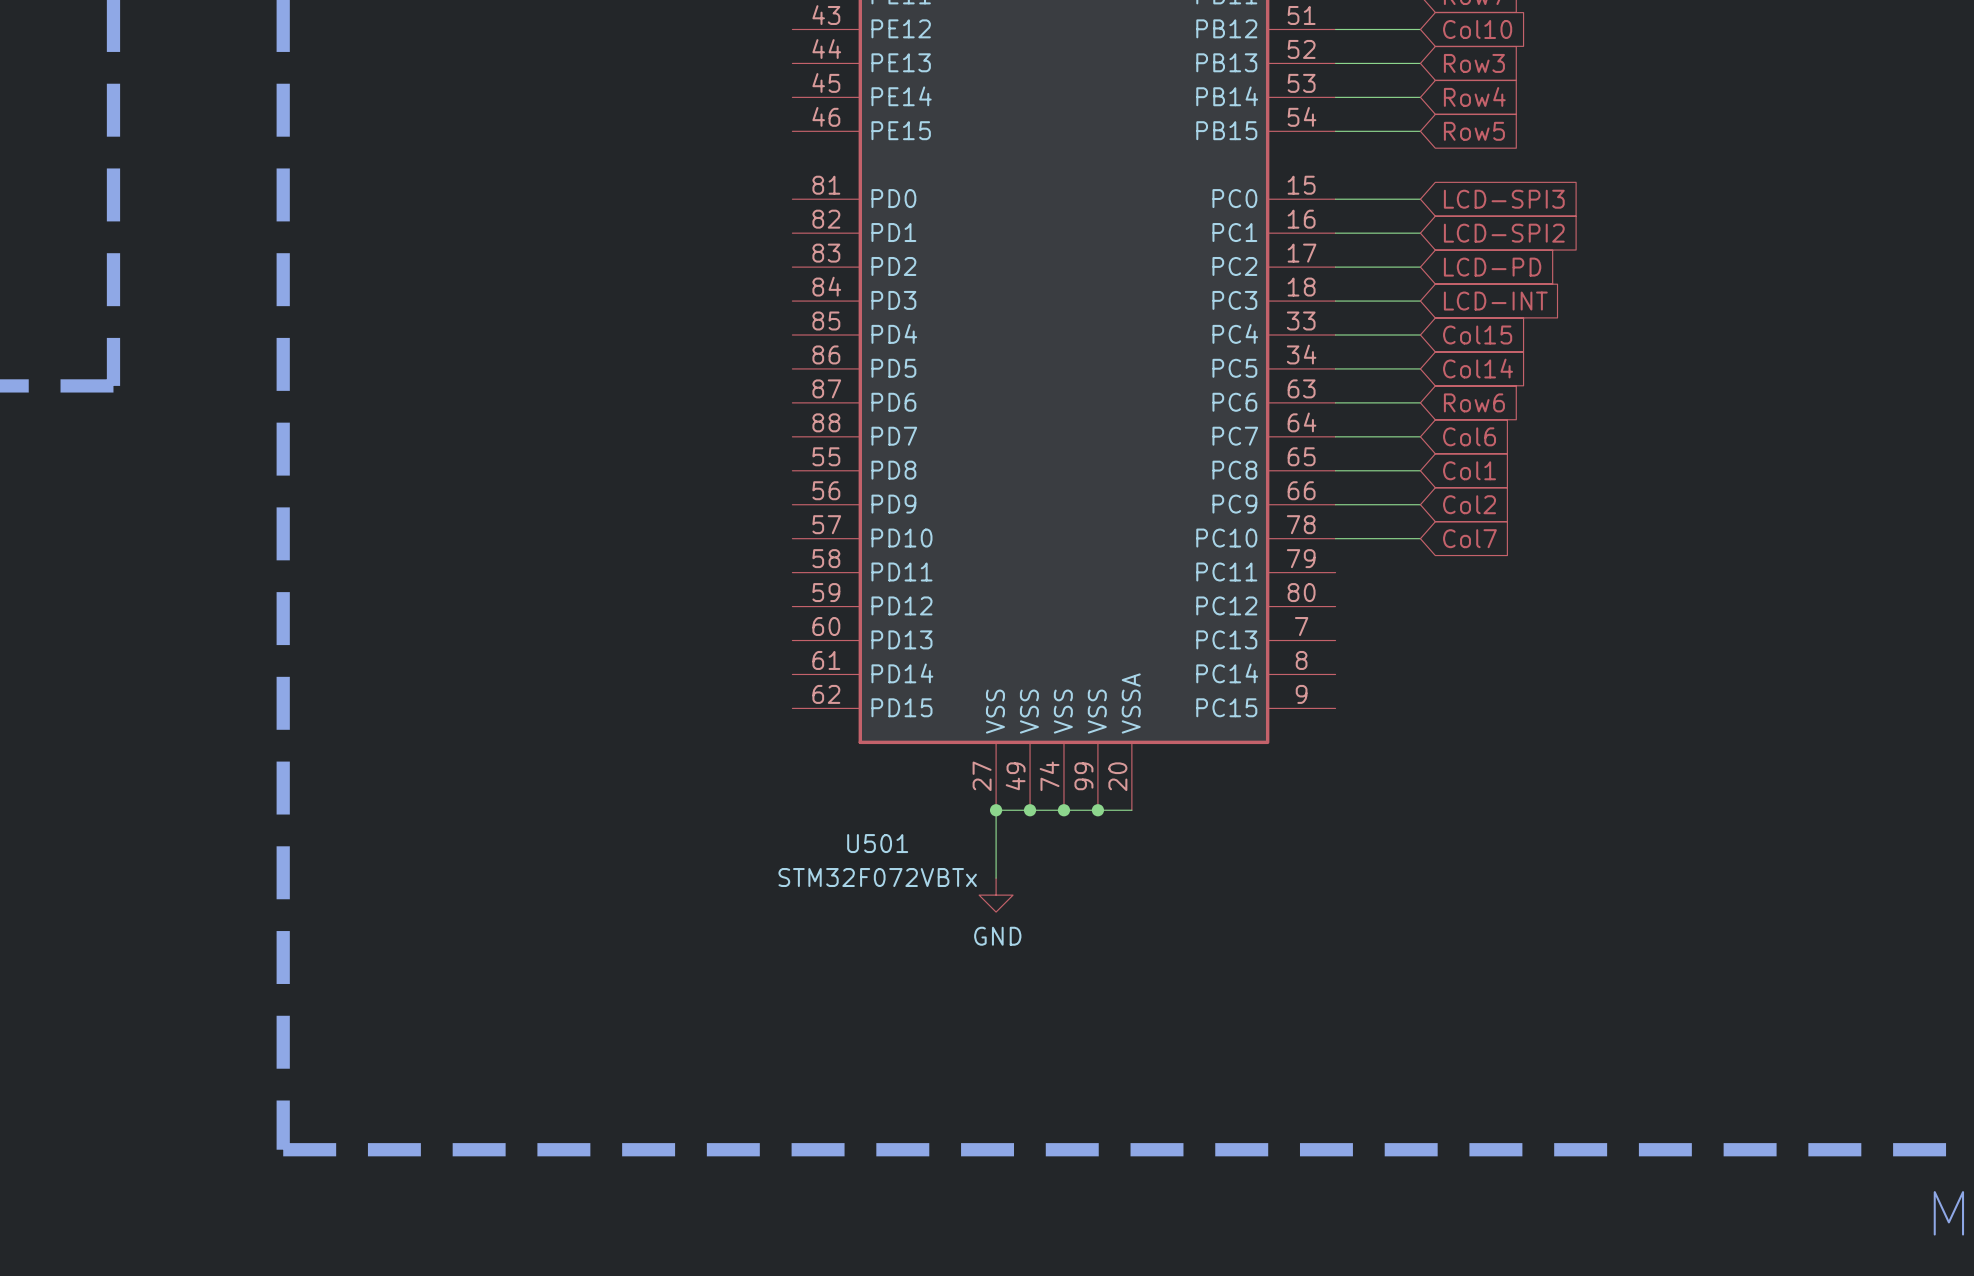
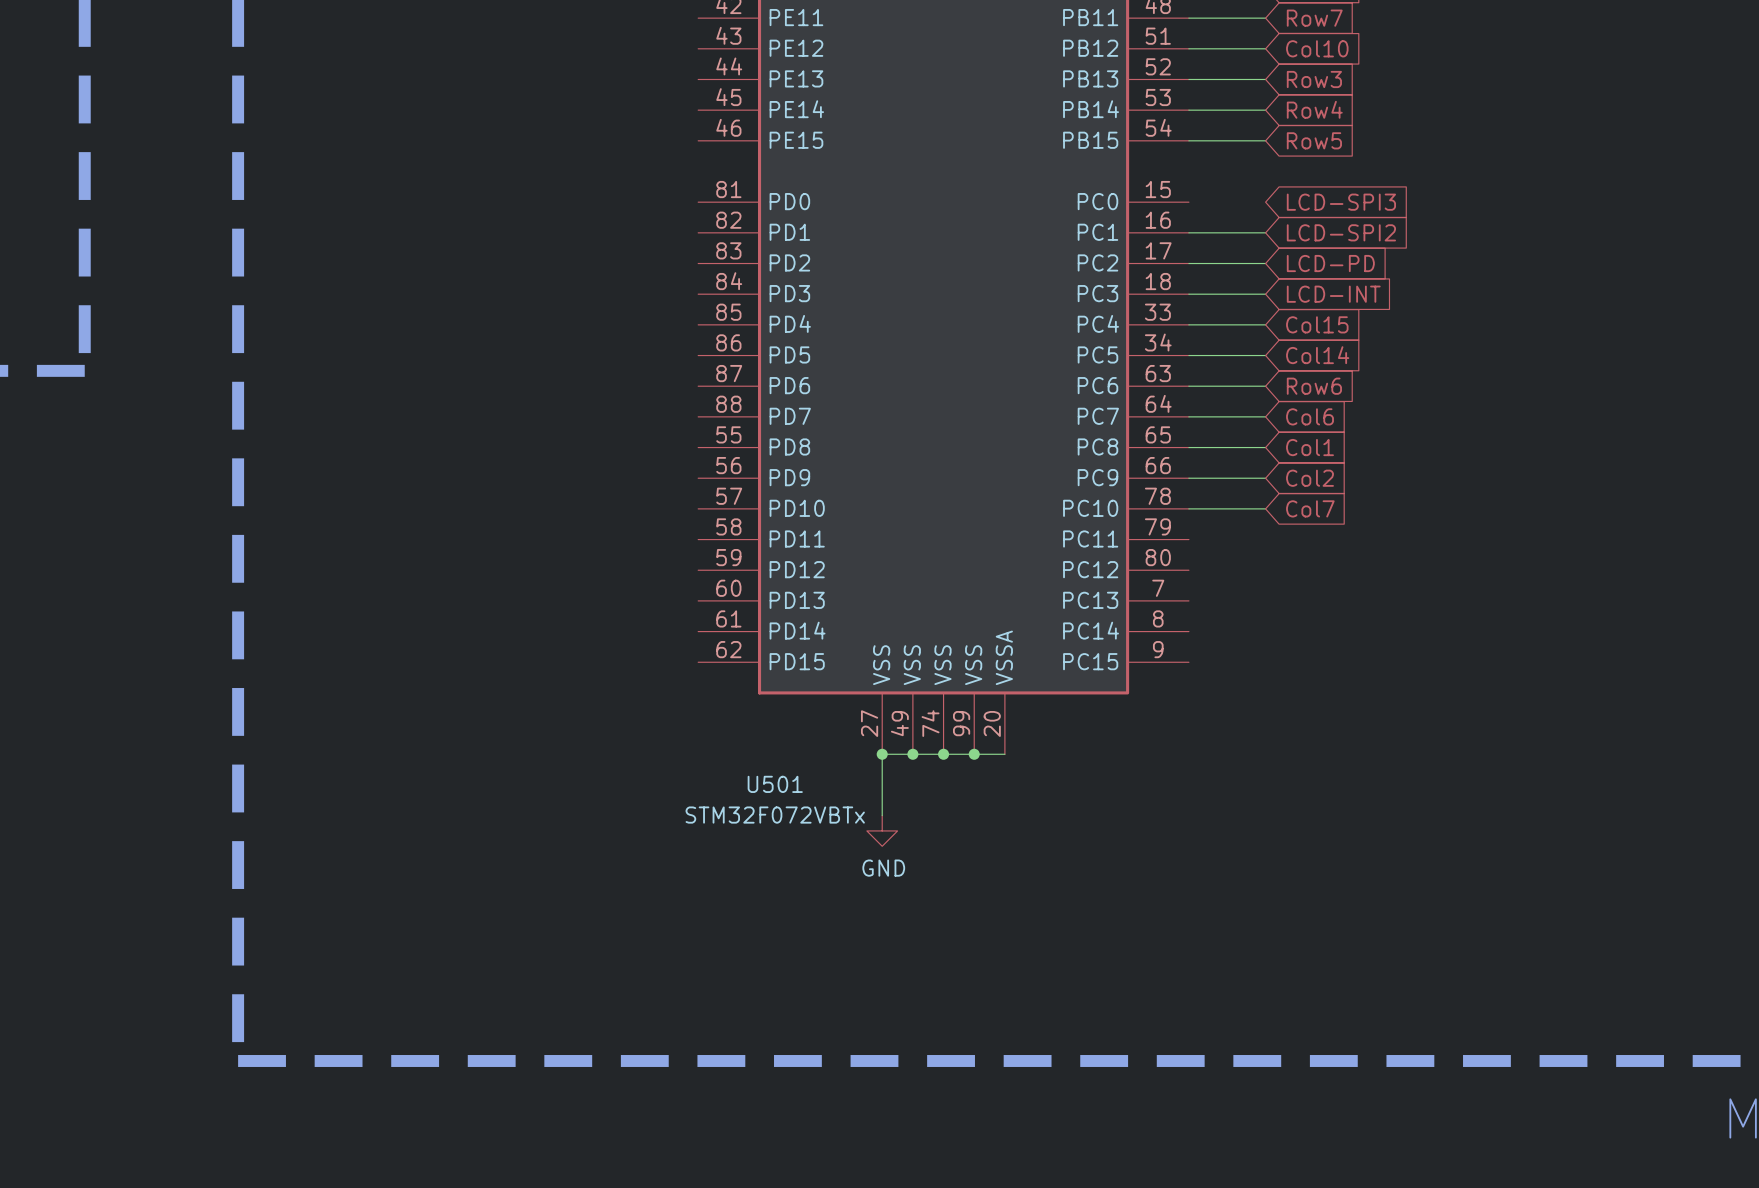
wire: (1335, 199) (1420, 199) -> none

